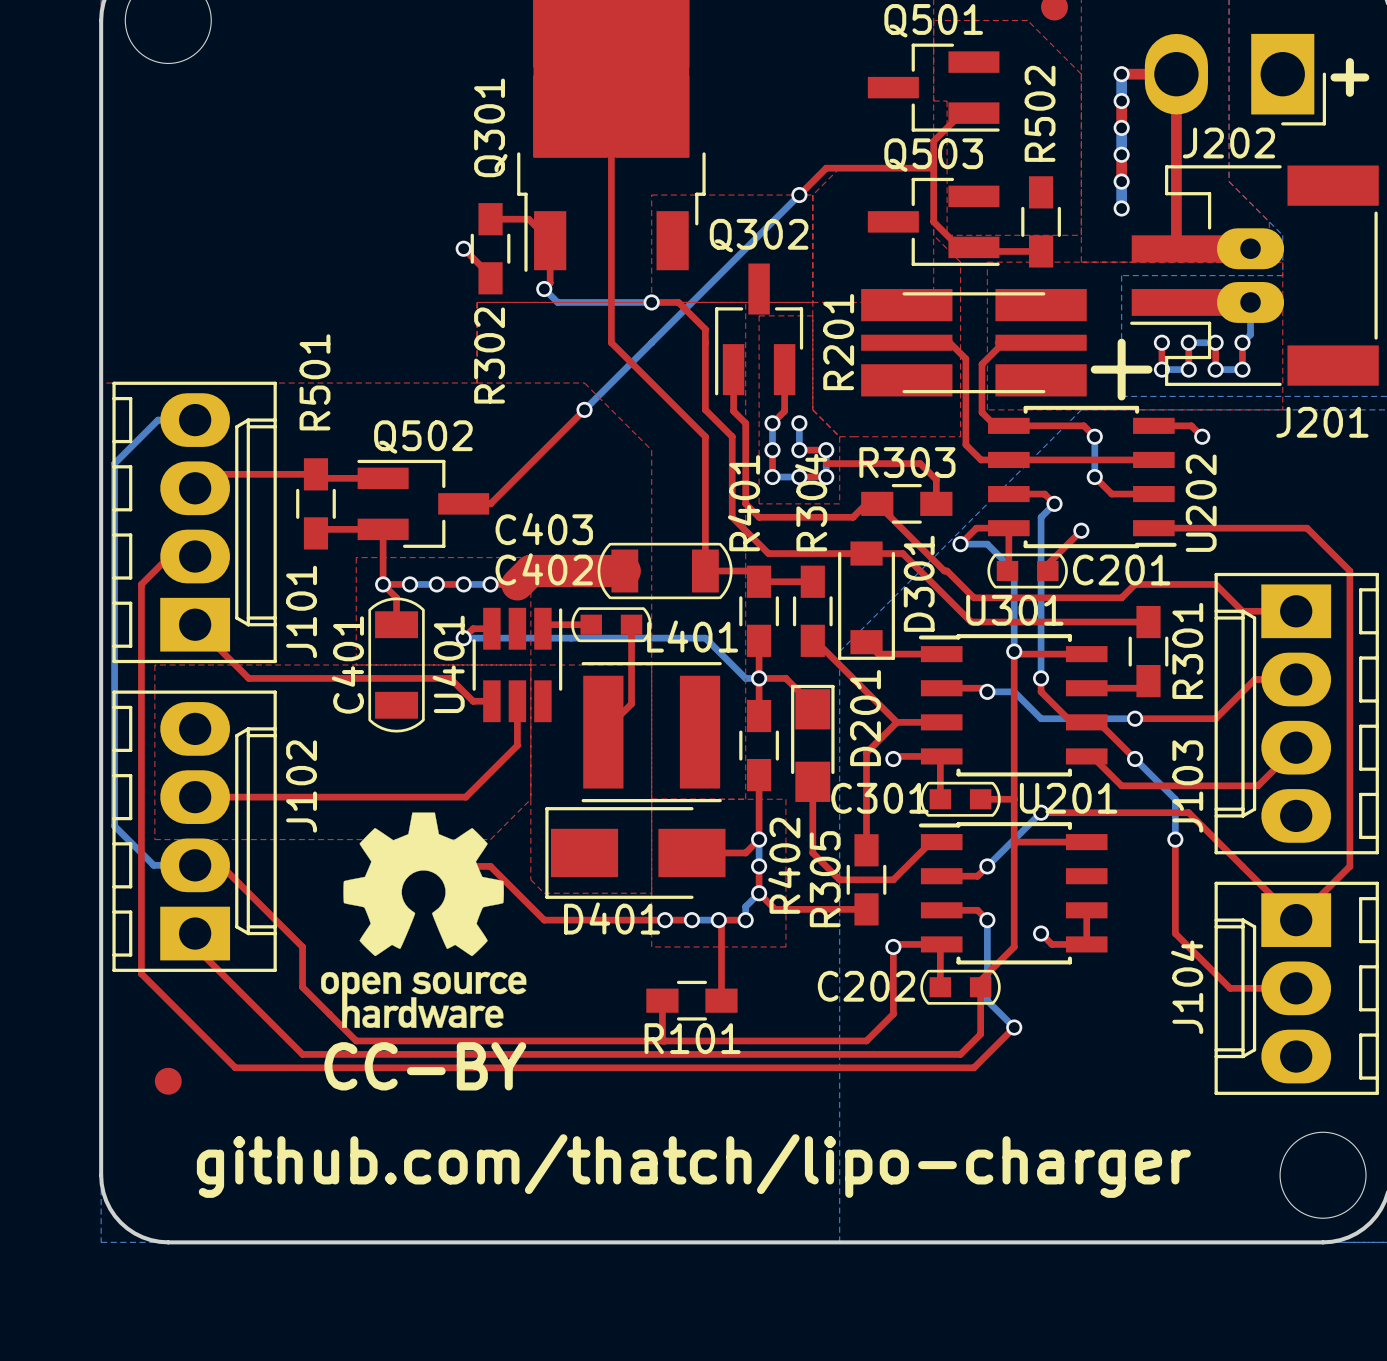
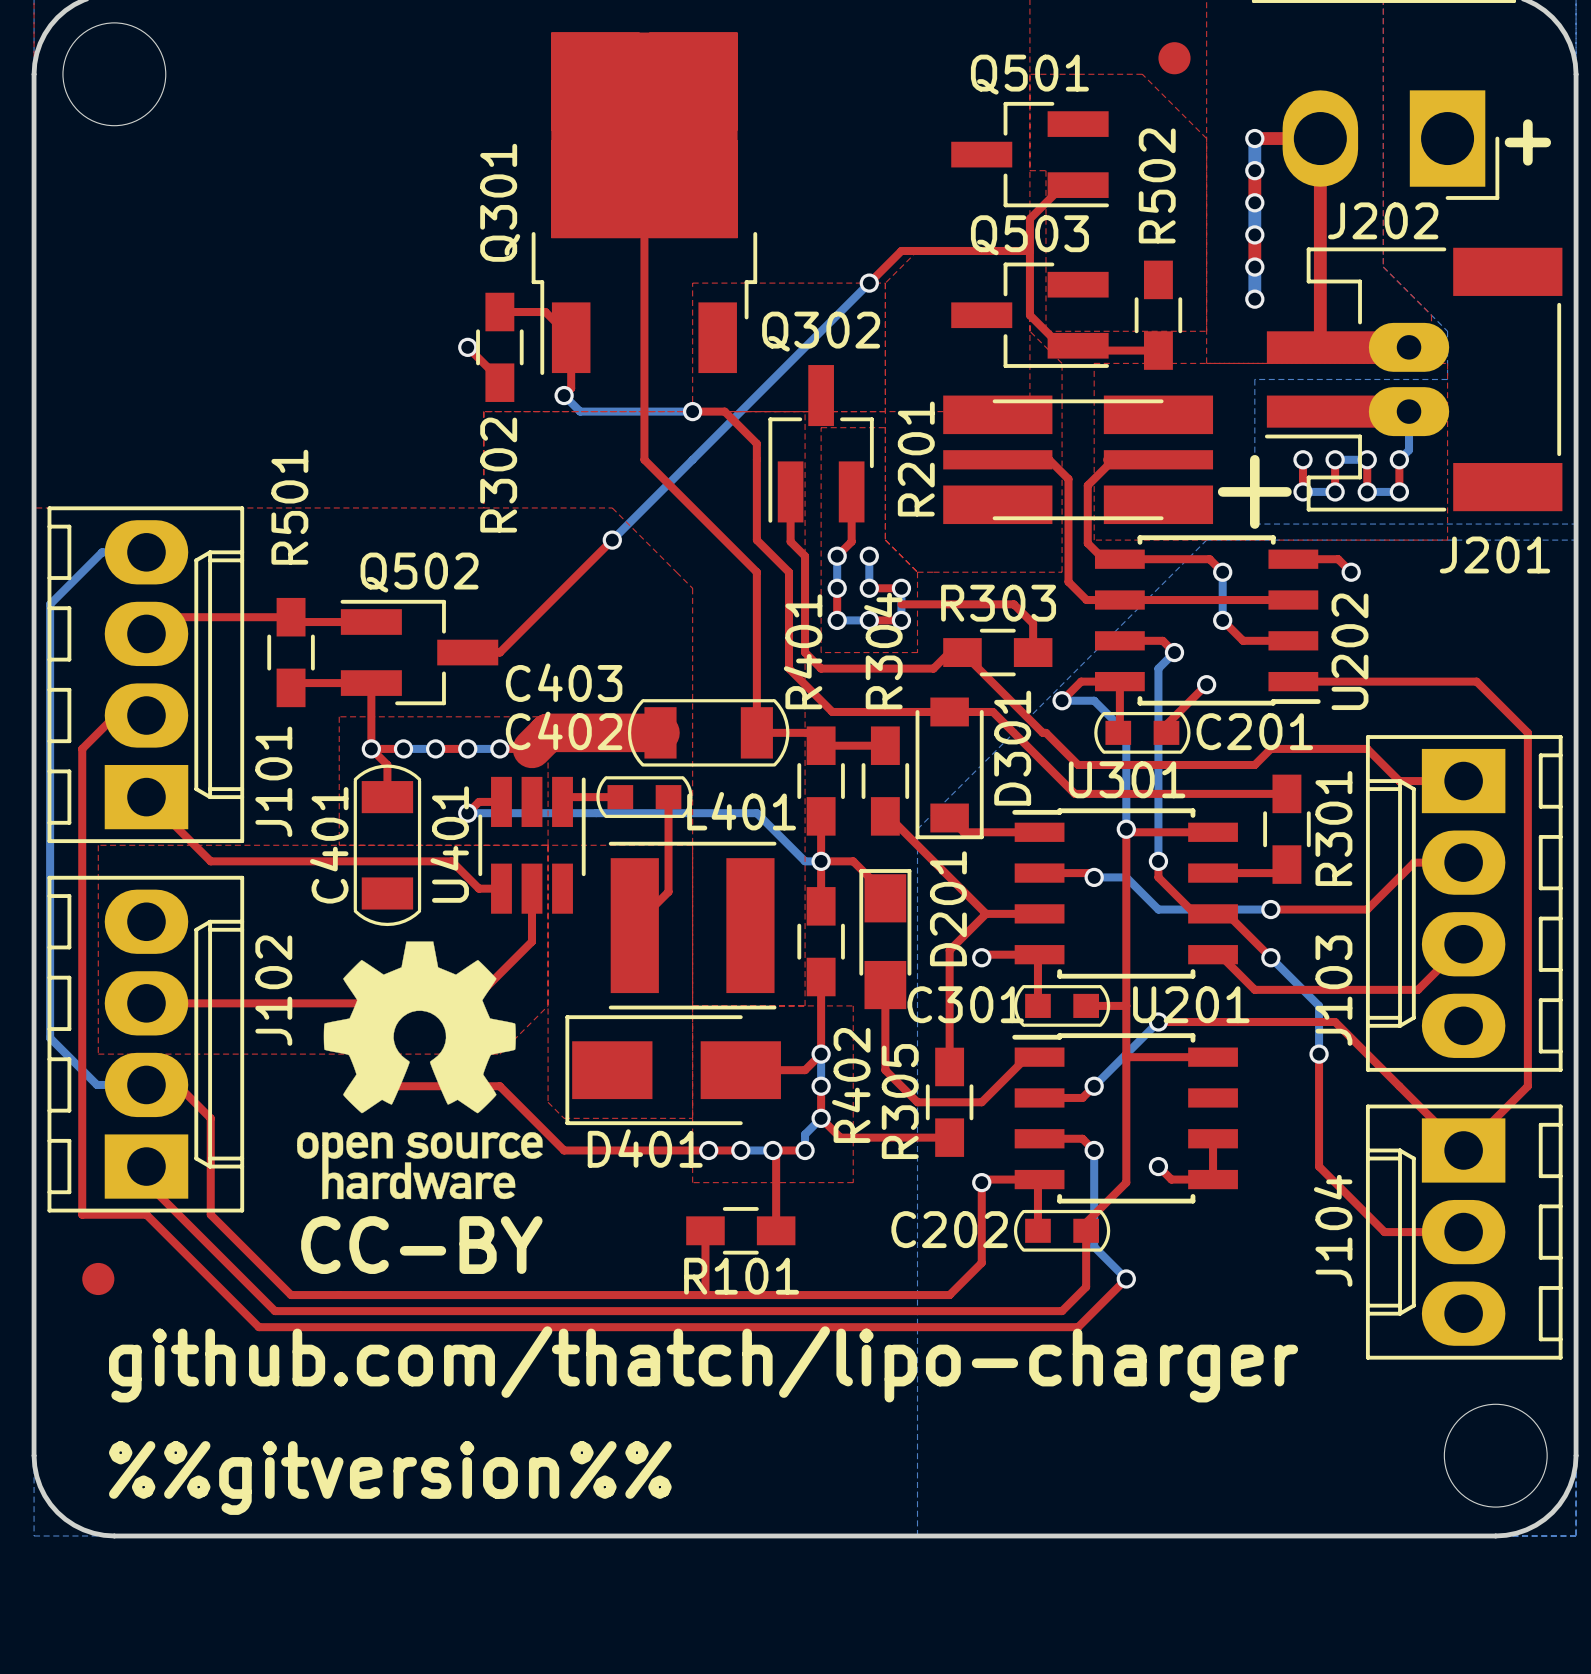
top track: (248, 893) (302, 946) (302, 987) (356, 1040) -> (210, 1118) (210, 1214) (291, 1295) (339, 1295)
drawing position: (423, 920) -> (419, 1070)
top track: (141, 973) (235, 1067) (289, 1067) -> (82, 1214) (146, 1214) (258, 1327)
R101 position: (691, 1000) -> (740, 1230)
text position: CC-BY (425, 1066) -> CC-BY (421, 1245)
part position: (168, 1081) -> (98, 1278)
text position: github.com/thatch/lipo-charger (693, 1166) -> github.com/thatch/lipo-charger (703, 1364)
text: none -> %%gitversion%% (390, 1477)

